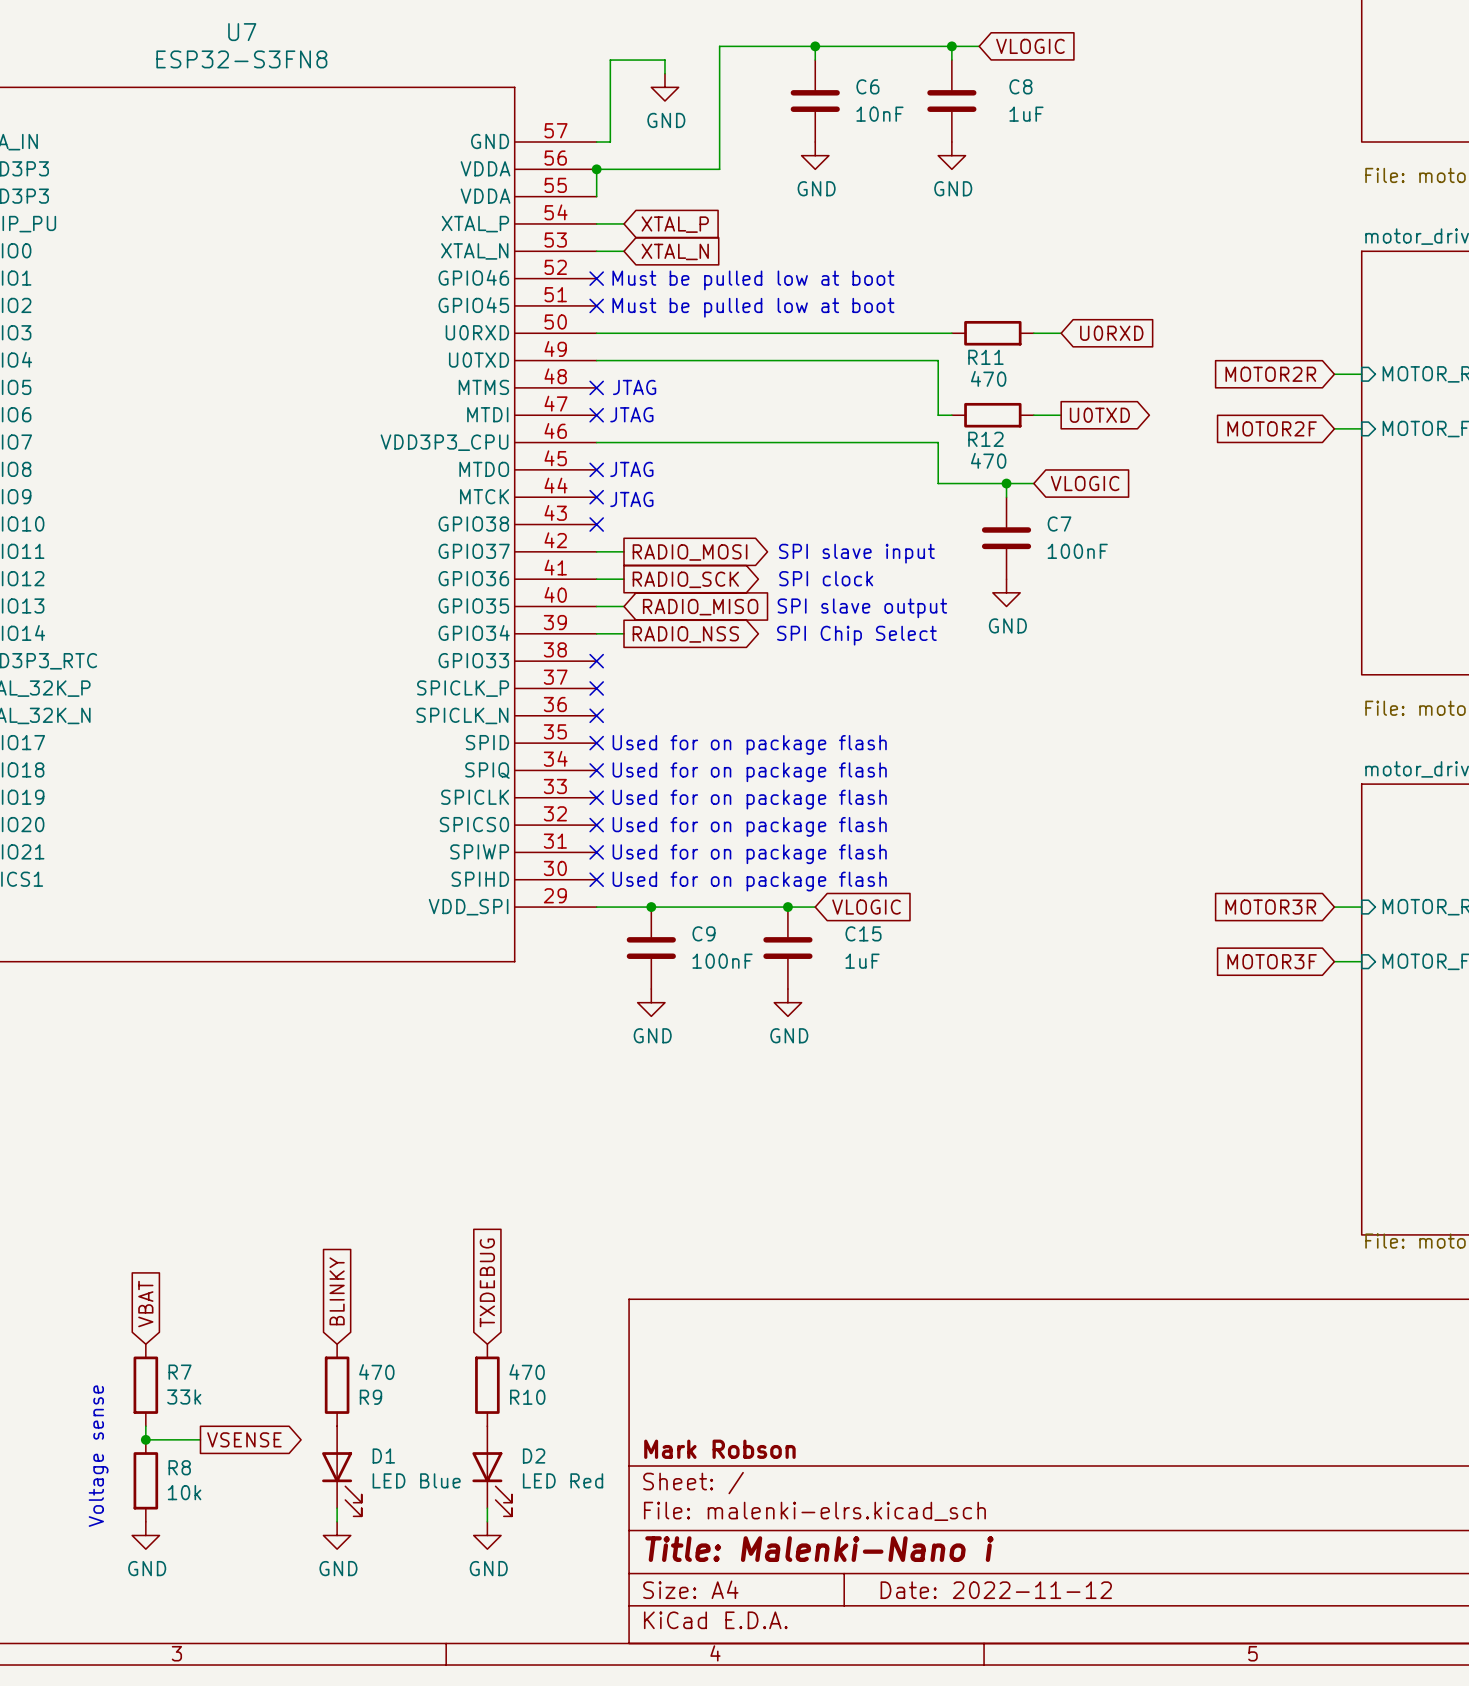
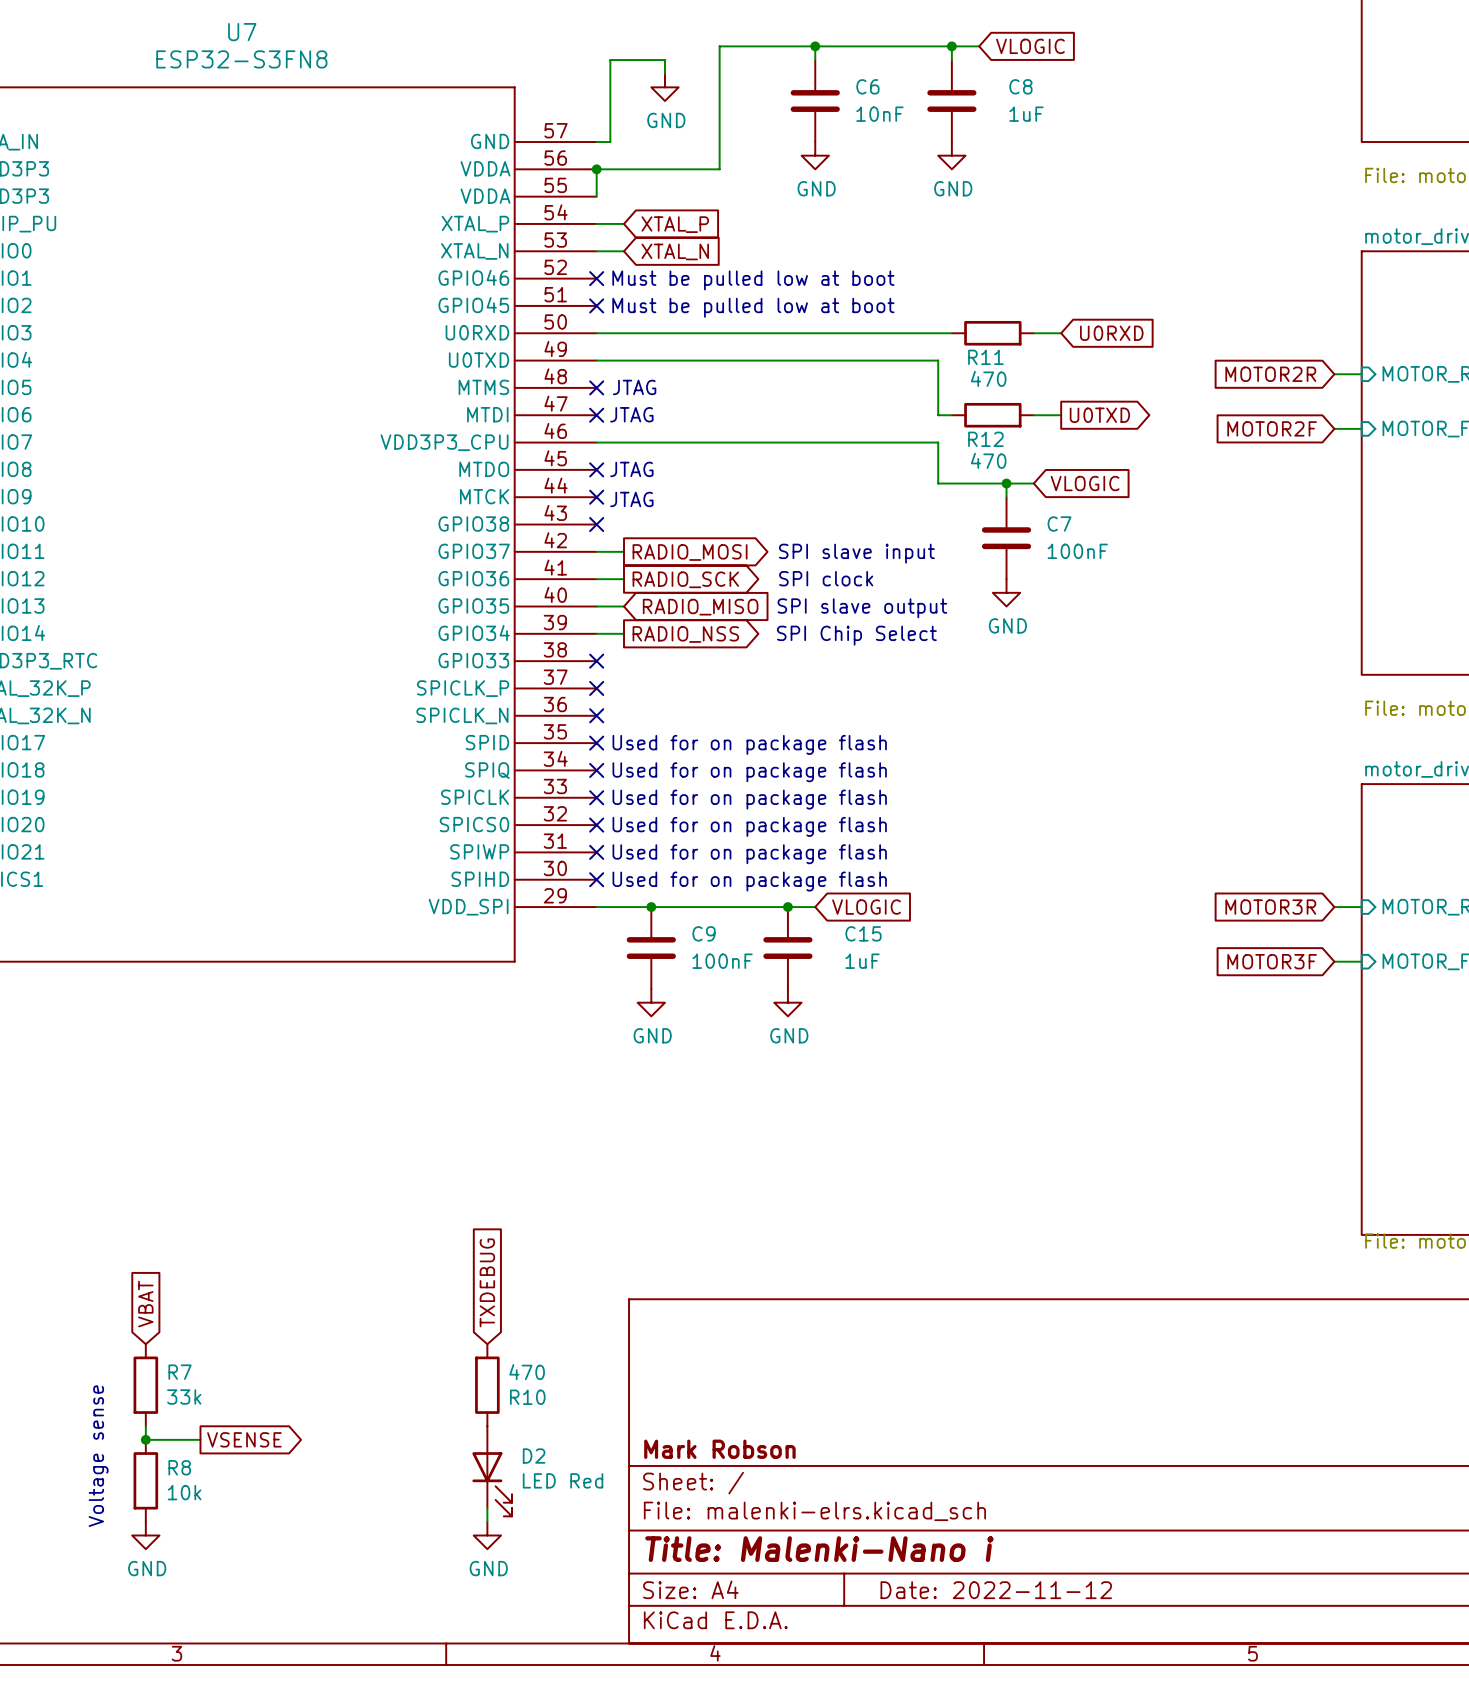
global label: BLINKY (337, 1291) -> none
R9: 470 (337, 1385) -> none
D1: LED Blue (341, 1471) -> none
wire: (337, 1508) (337, 1521) -> none
power symbol: GND (337, 1535) -> none

